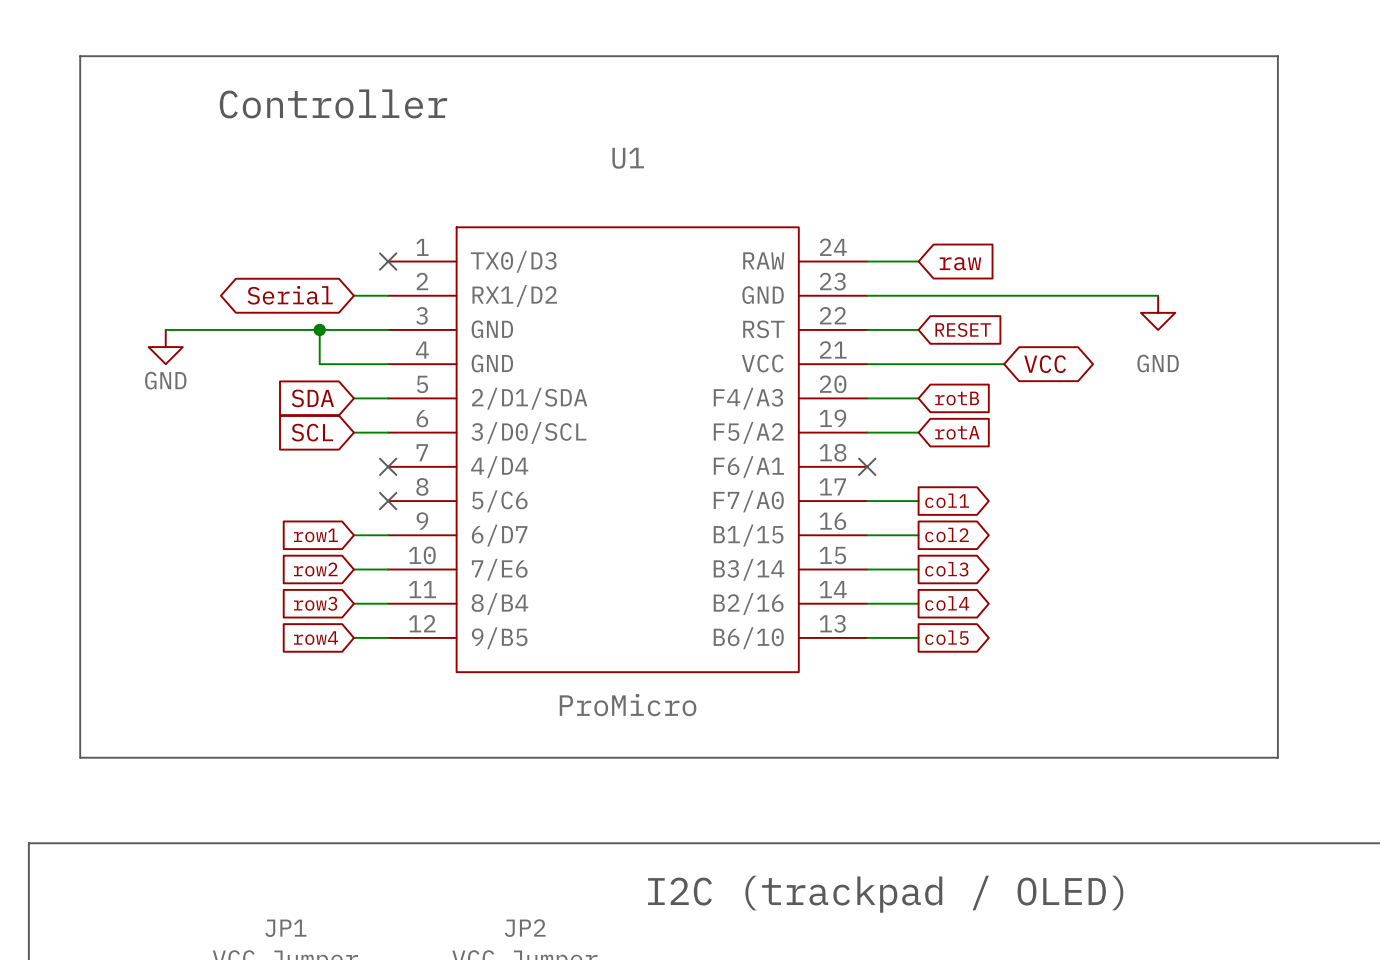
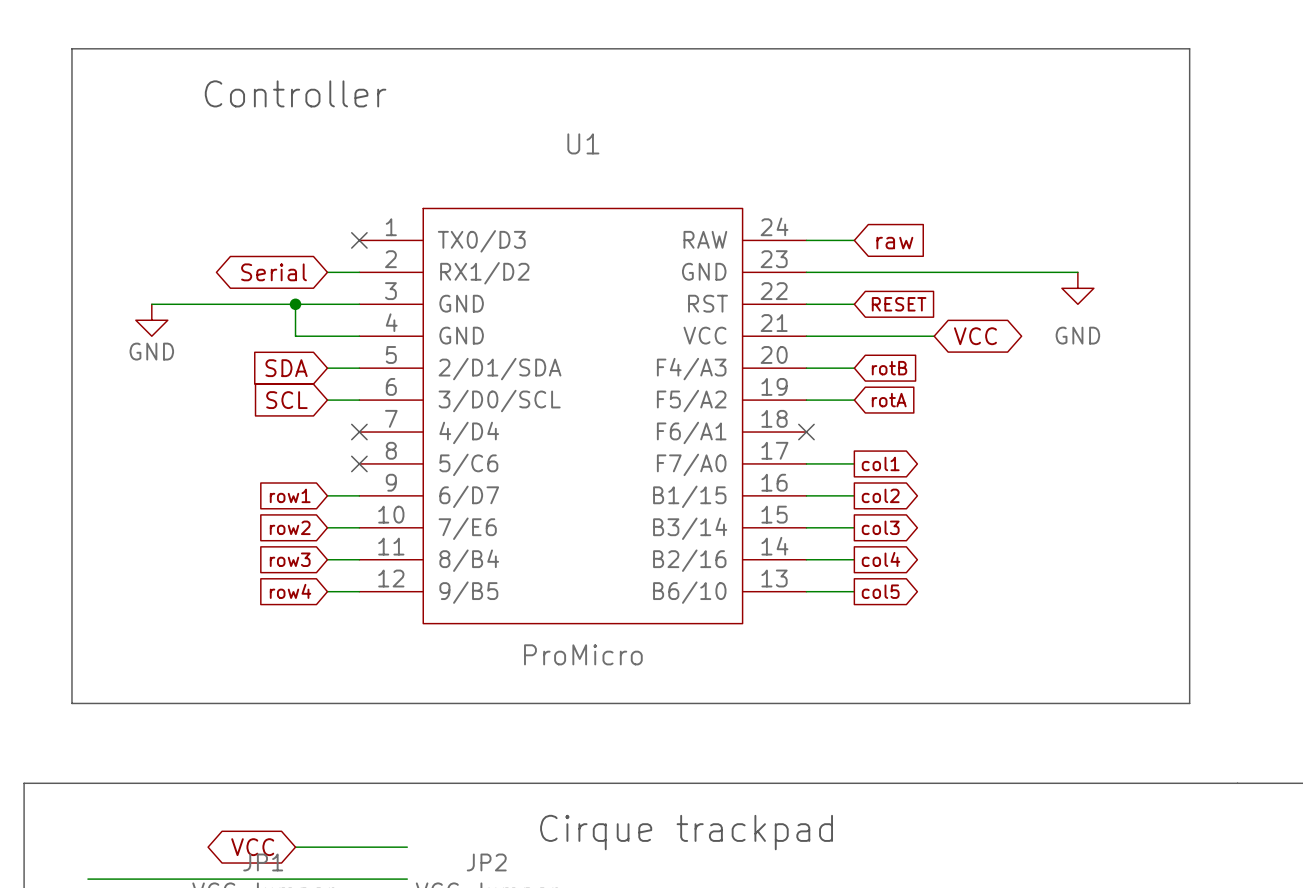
text: none -> Cirque trackpad (686, 832)
text: I2C (trackpad / OLED) (885, 894) -> none
global label: none -> VCC (252, 847)
wire: none -> (295, 847) (407, 847)
wire: none -> (87, 879) (407, 879)

